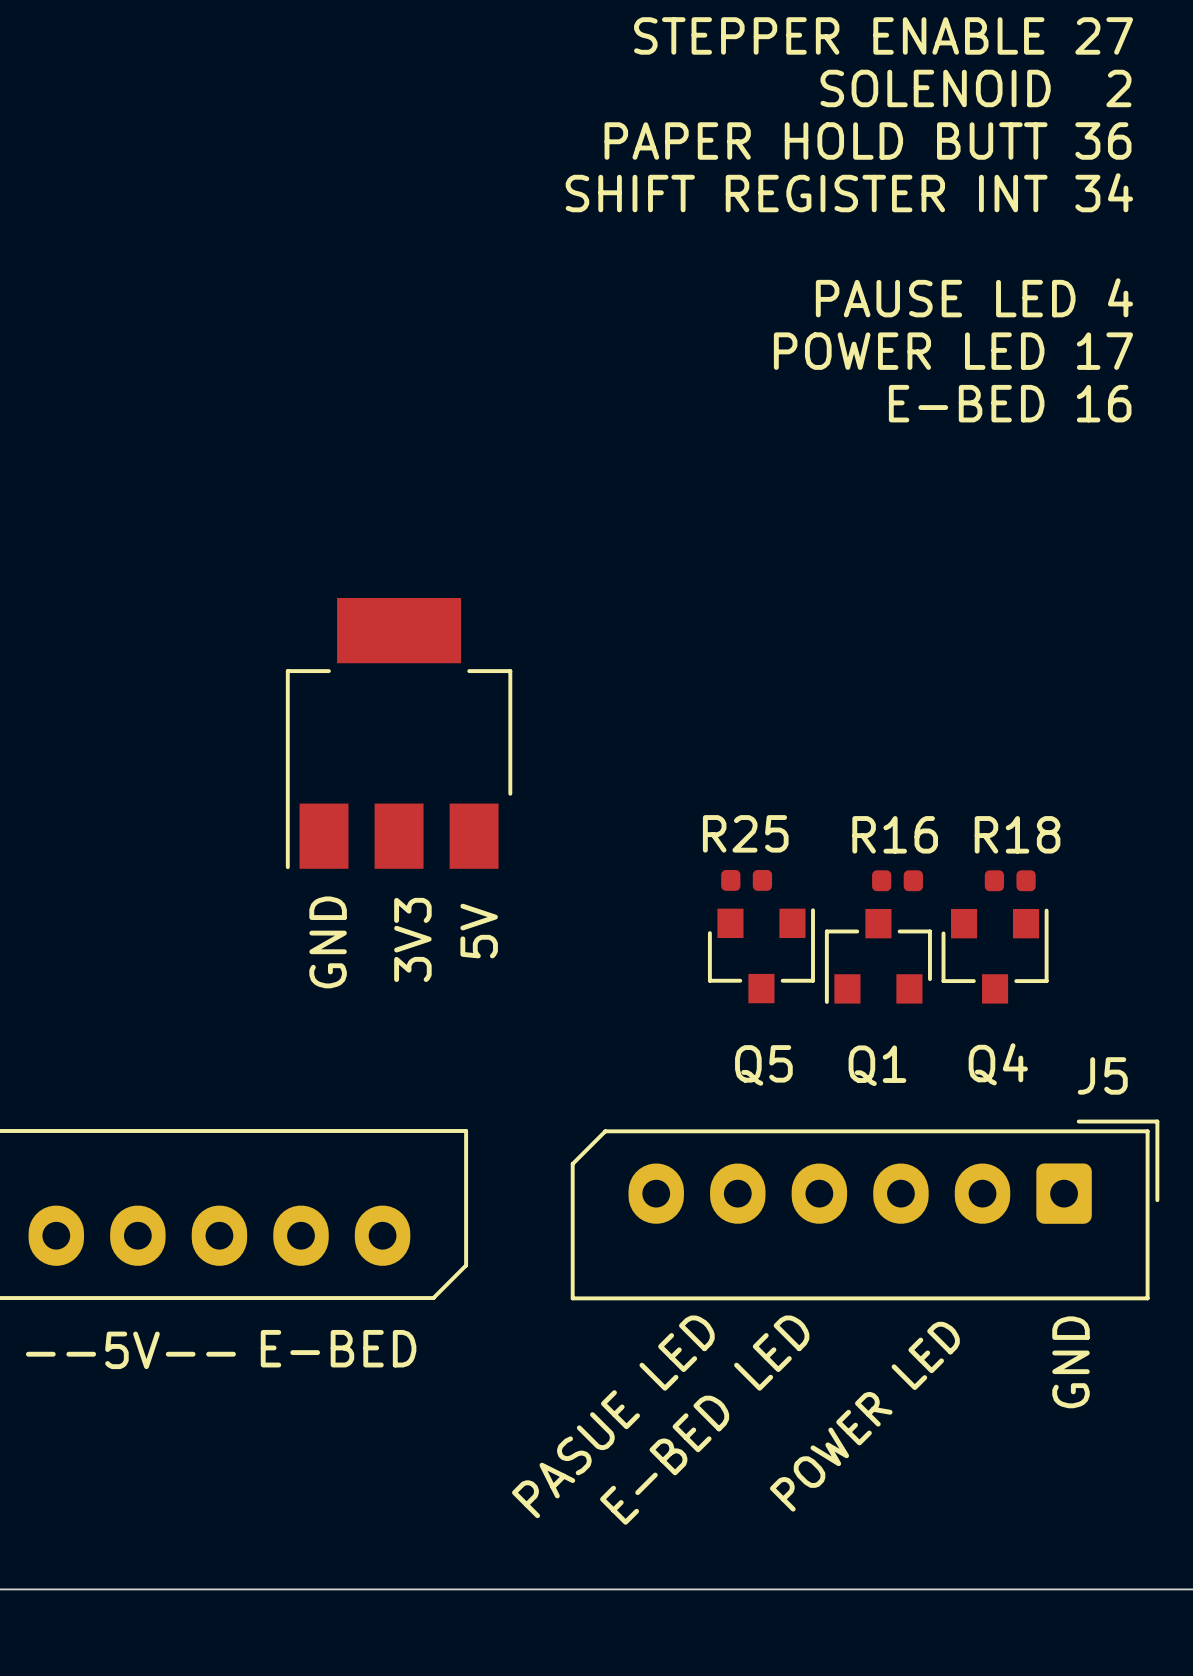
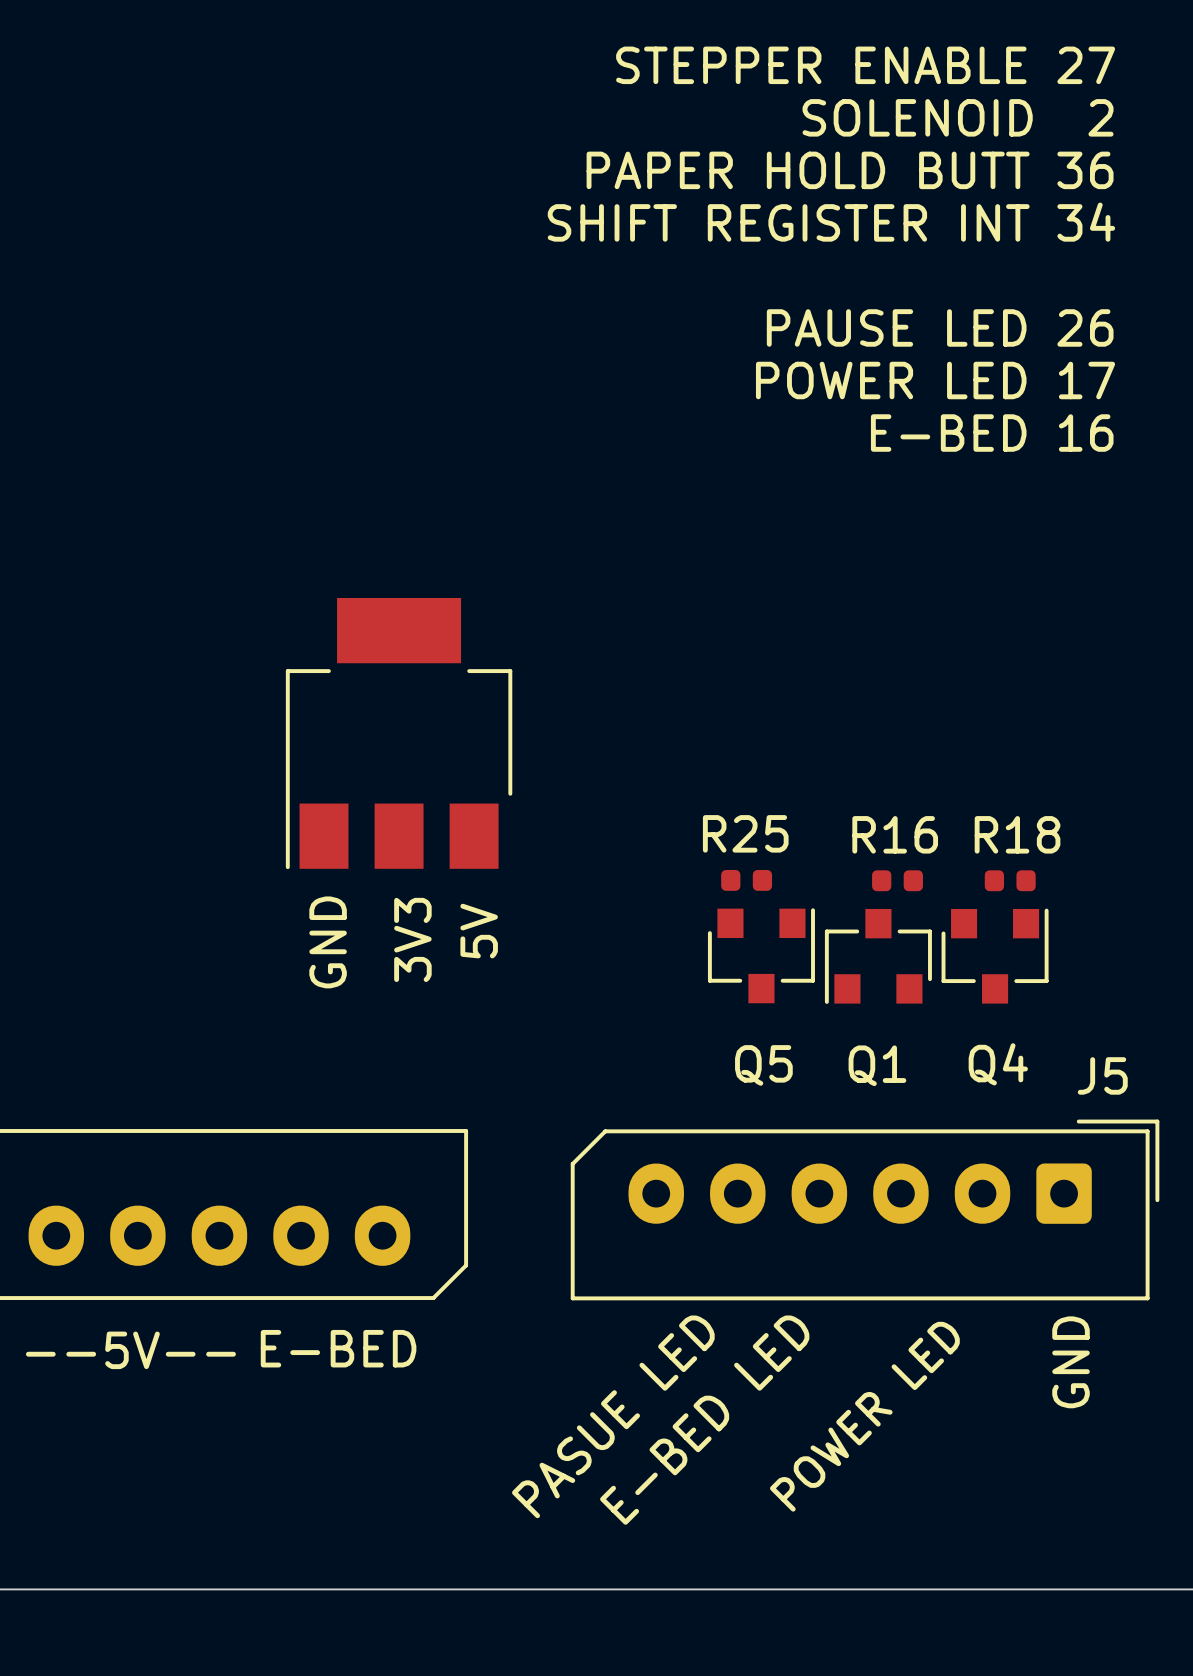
text position: STEPPER ENABLE 27 (883, 35) -> STEPPER ENABLE 27 (865, 65)
text position: SOLENOID 2 (975, 88) -> SOLENOID 2 (958, 117)
text position: PAPER HOLD BUTT 36 (868, 141) -> PAPER HOLD BUTT 36 (850, 170)
text position: SHIFT REGISTER INT 34 (849, 192) -> SHIFT REGISTER INT 34 (831, 222)
text: PAUSE LED 4 (974, 297) -> PAUSE LED 26 (940, 327)
text position: POWER LED 17 (953, 351) -> POWER LED 17 (935, 380)
text position: E-BED 16 (1010, 403) -> E-BED 16 (992, 433)

